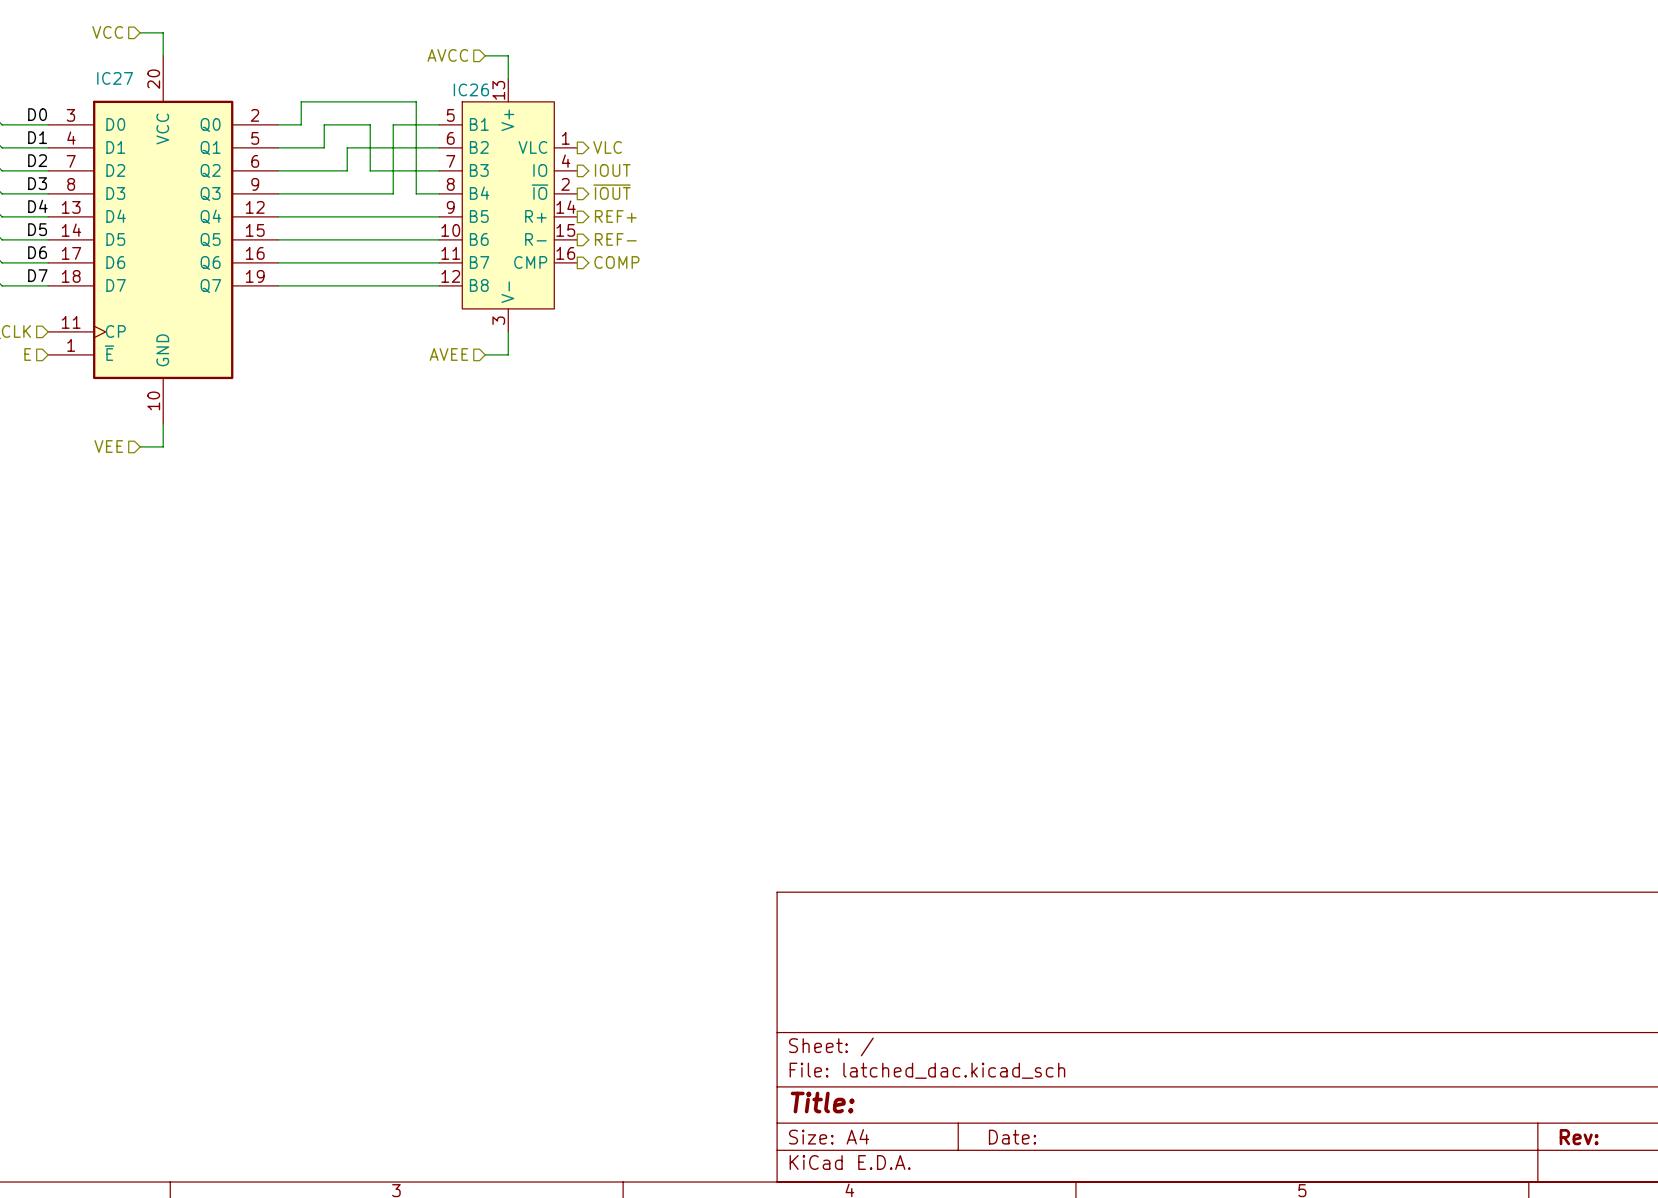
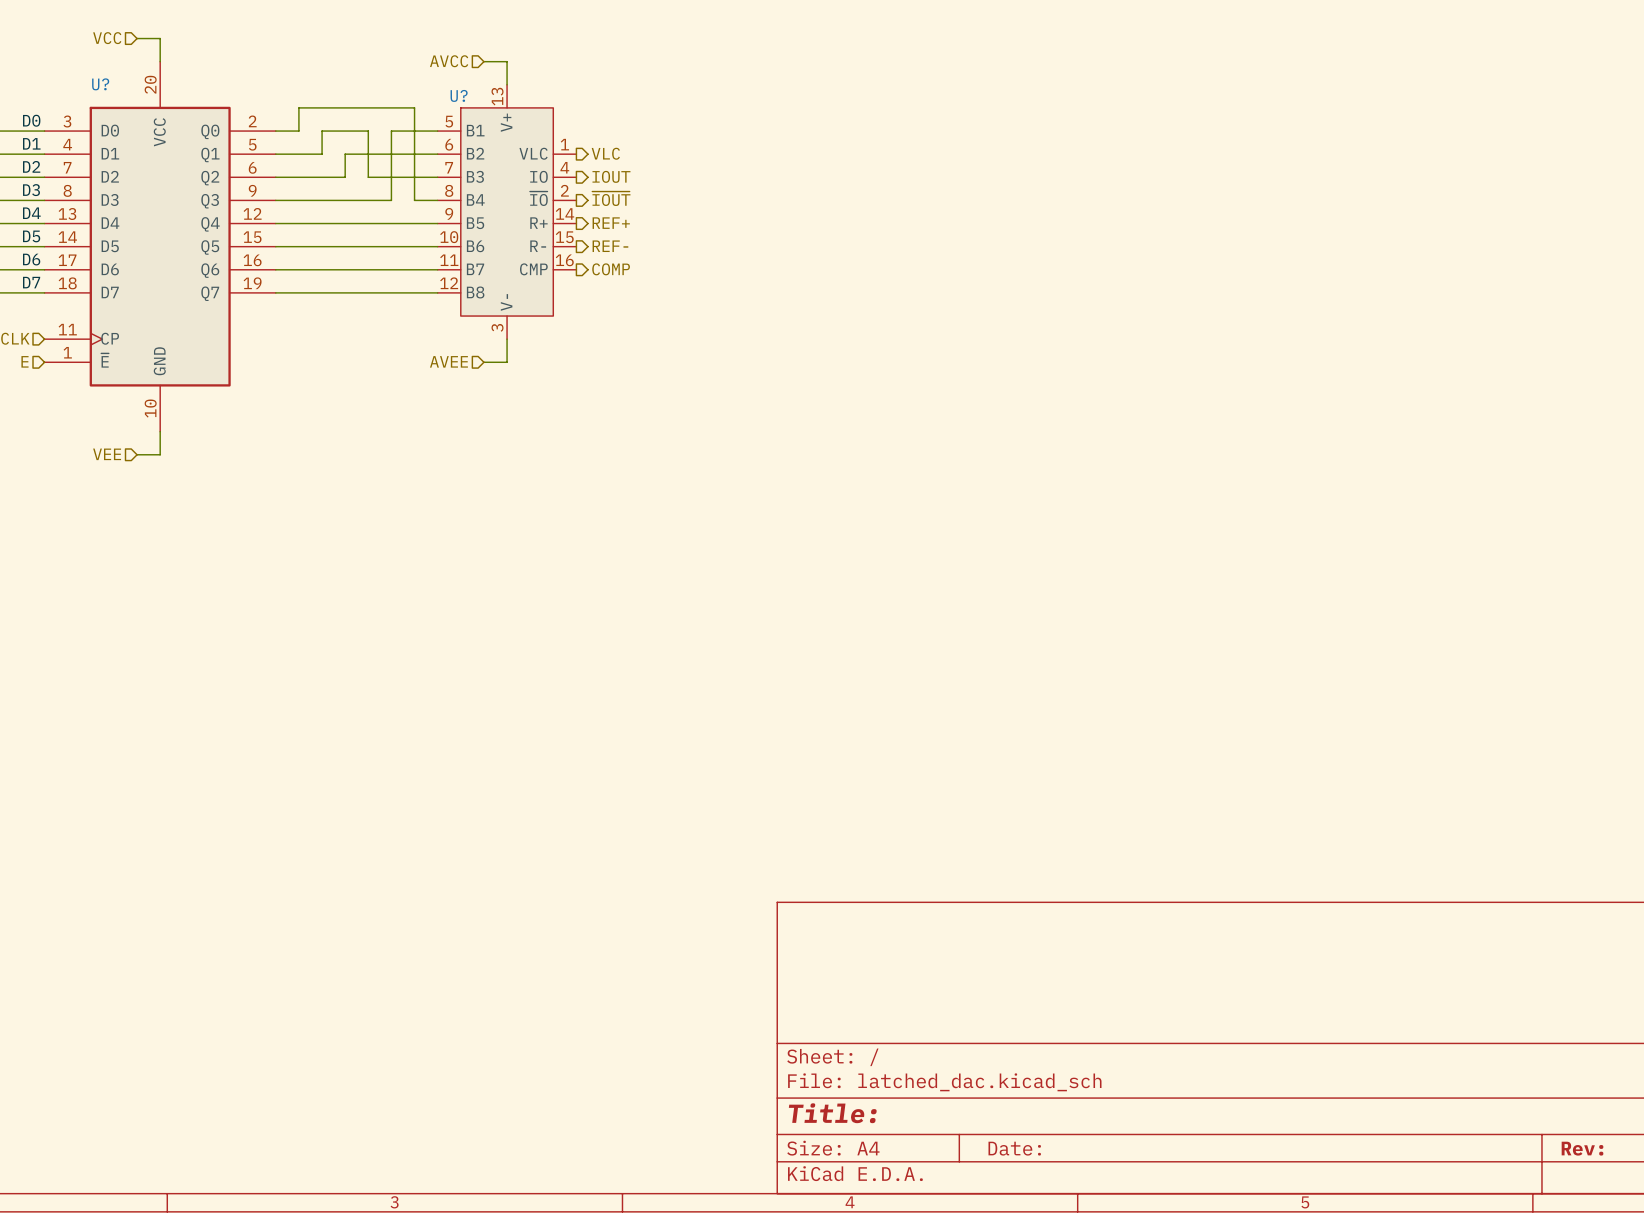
IC27 name: IC27 (115, 78) -> U? (100, 84)
IC26 name: IC26 (471, 89) -> U? (459, 95)

